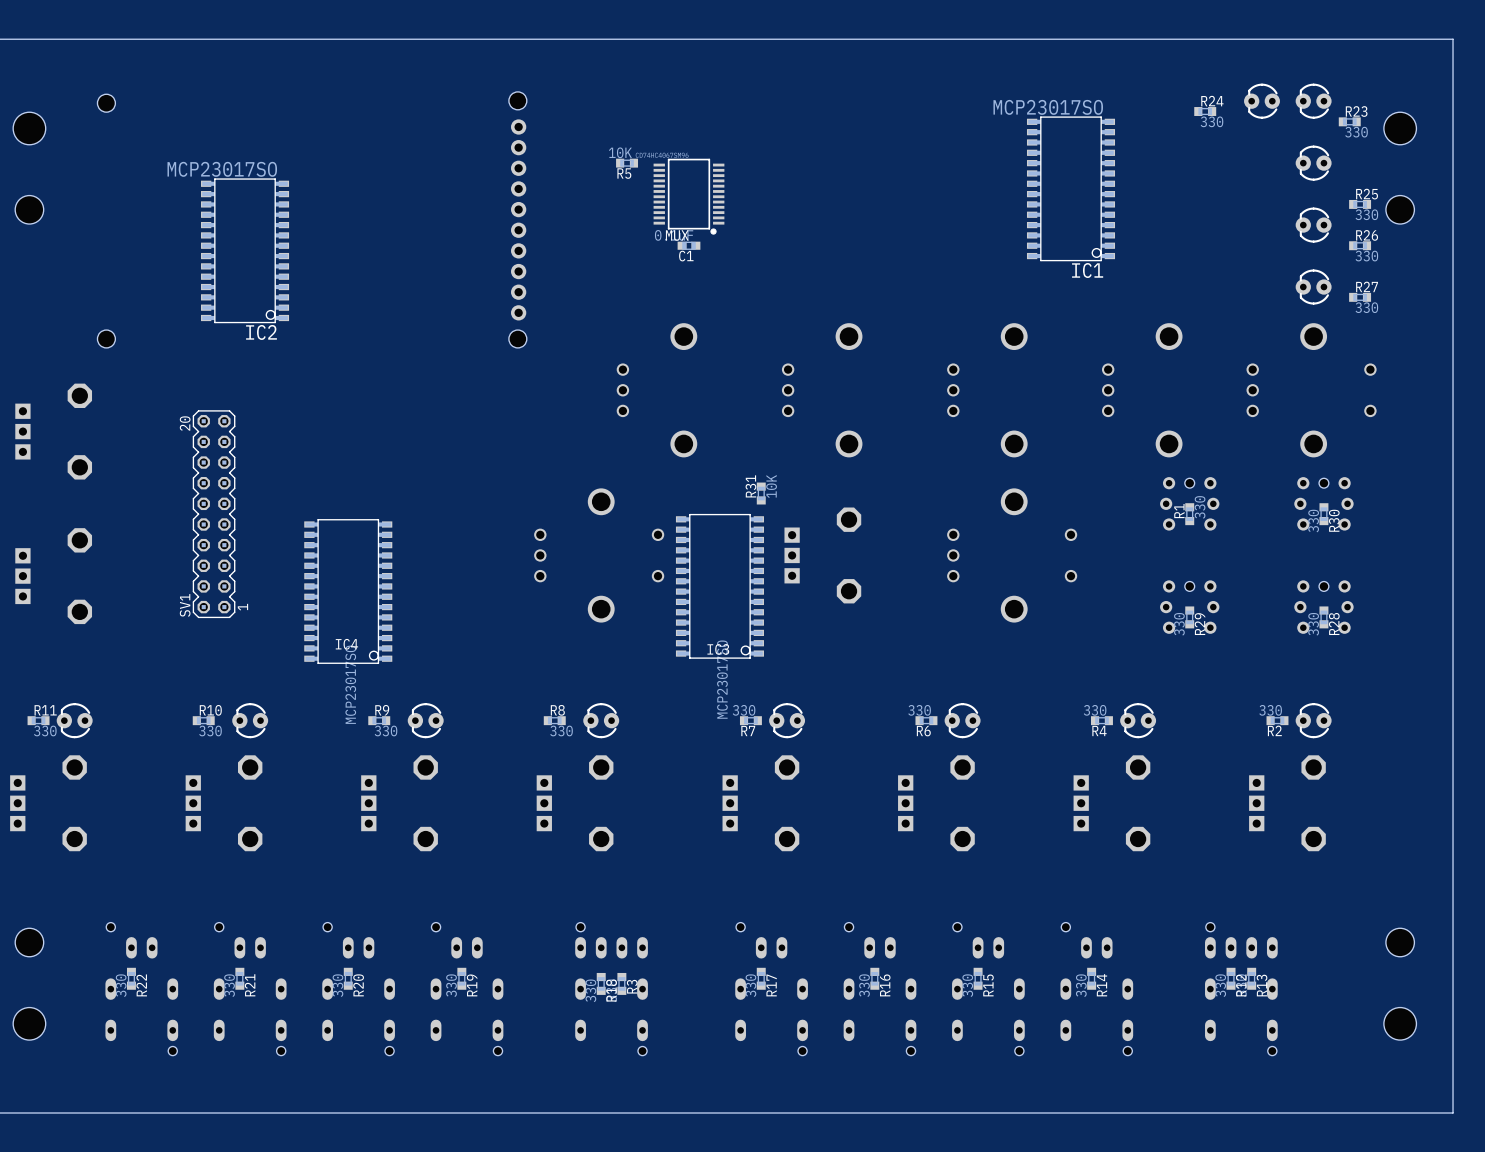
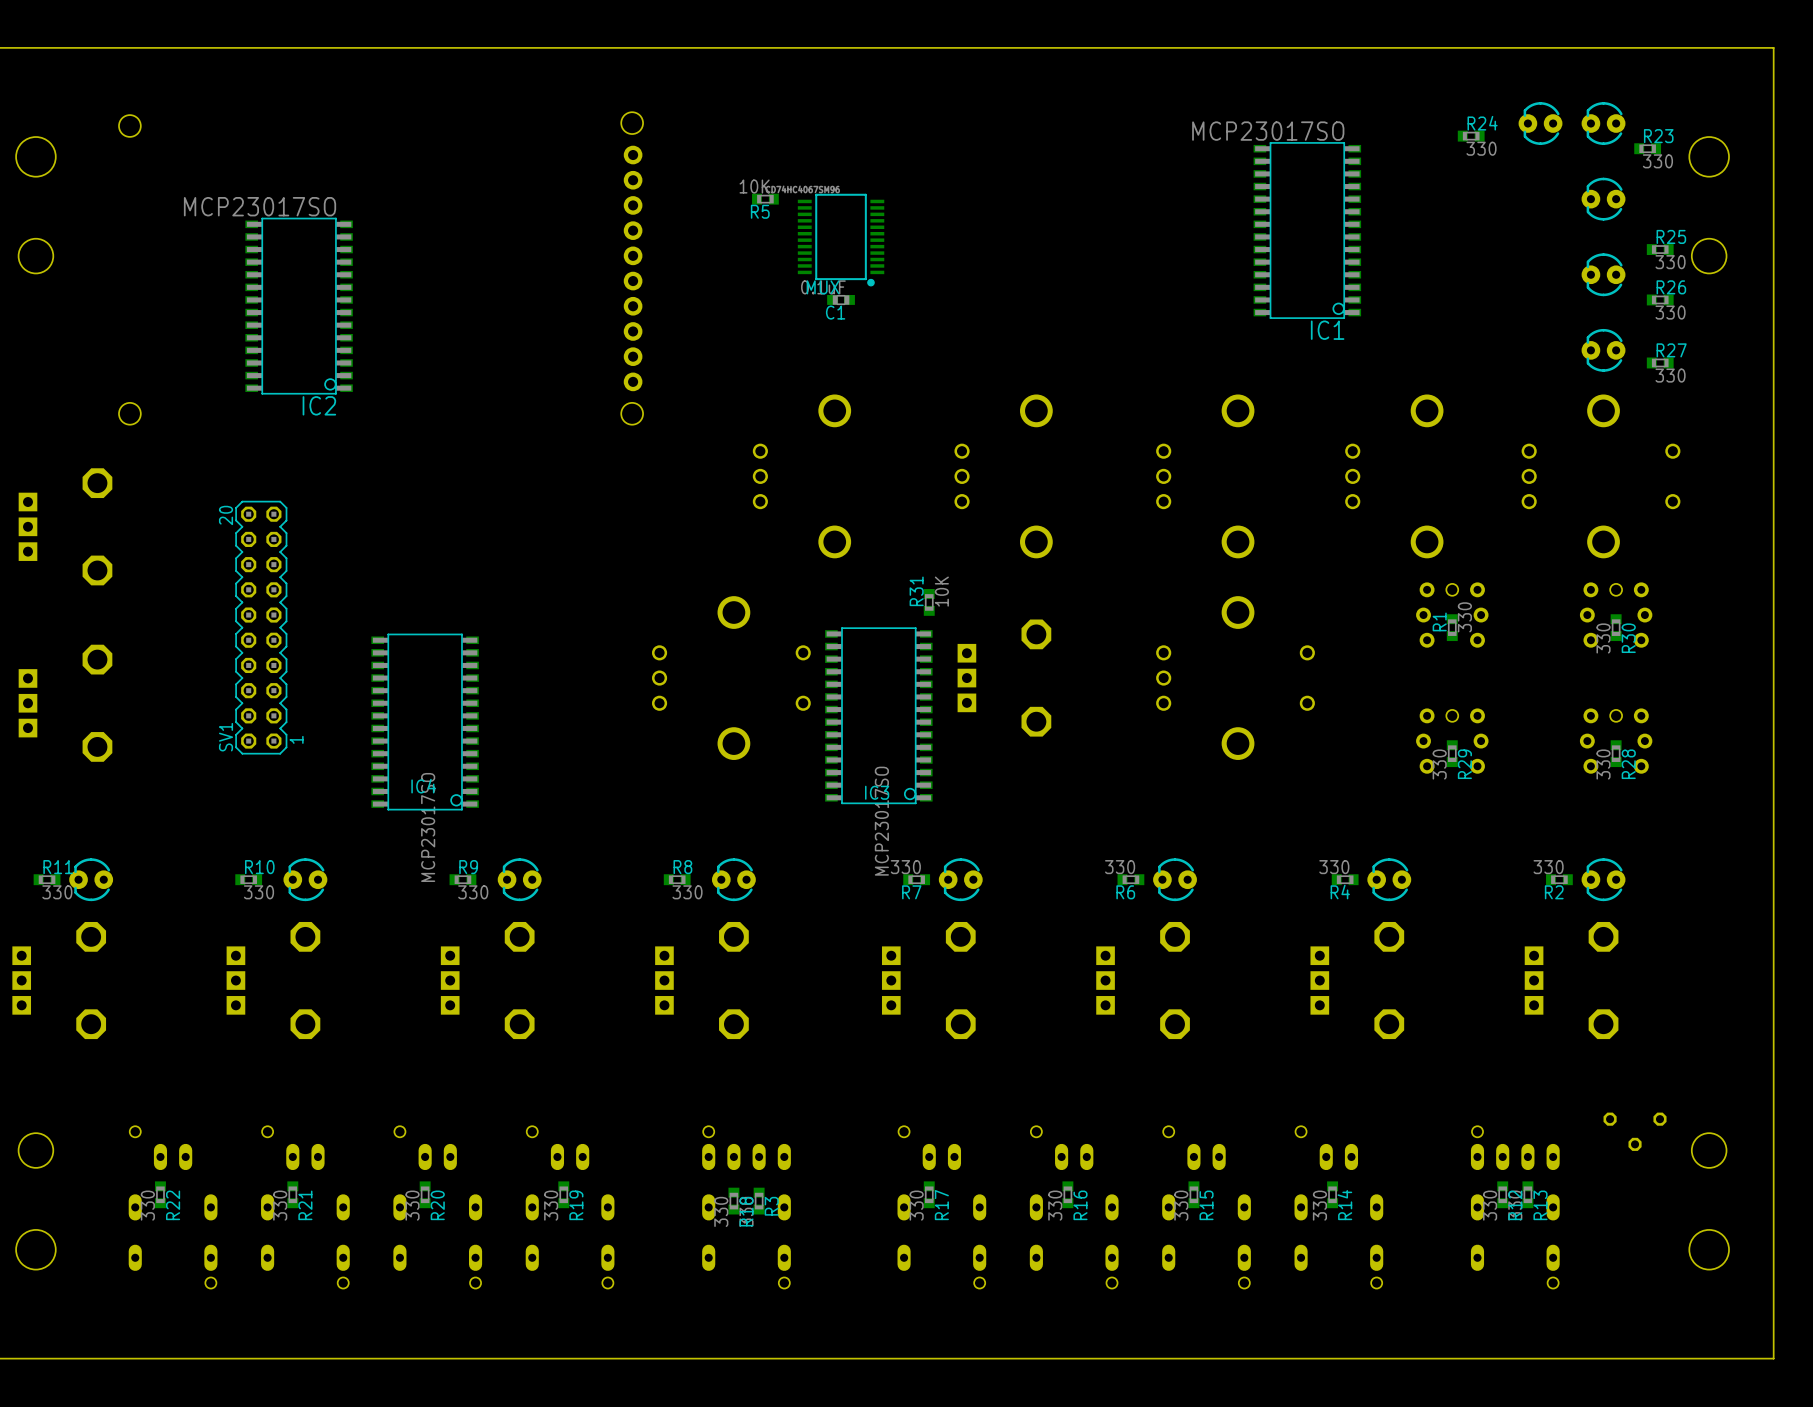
part: none -> (1635, 1131)

